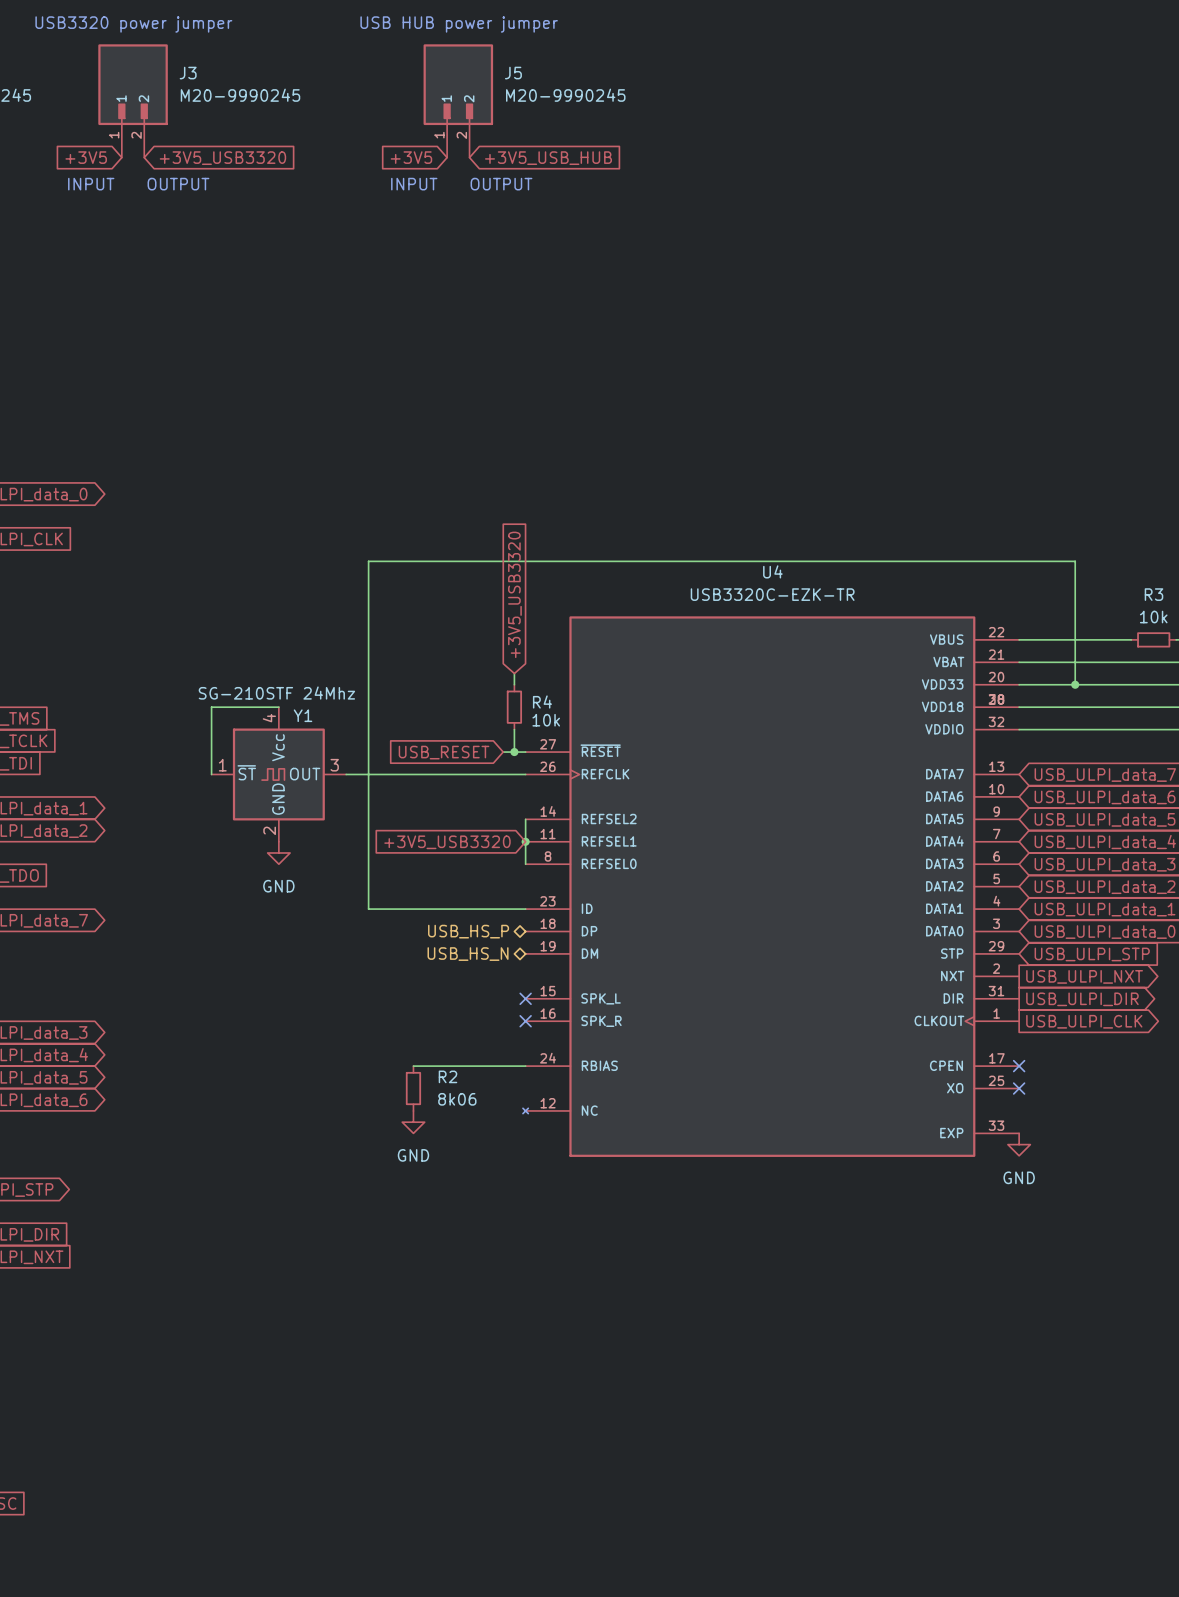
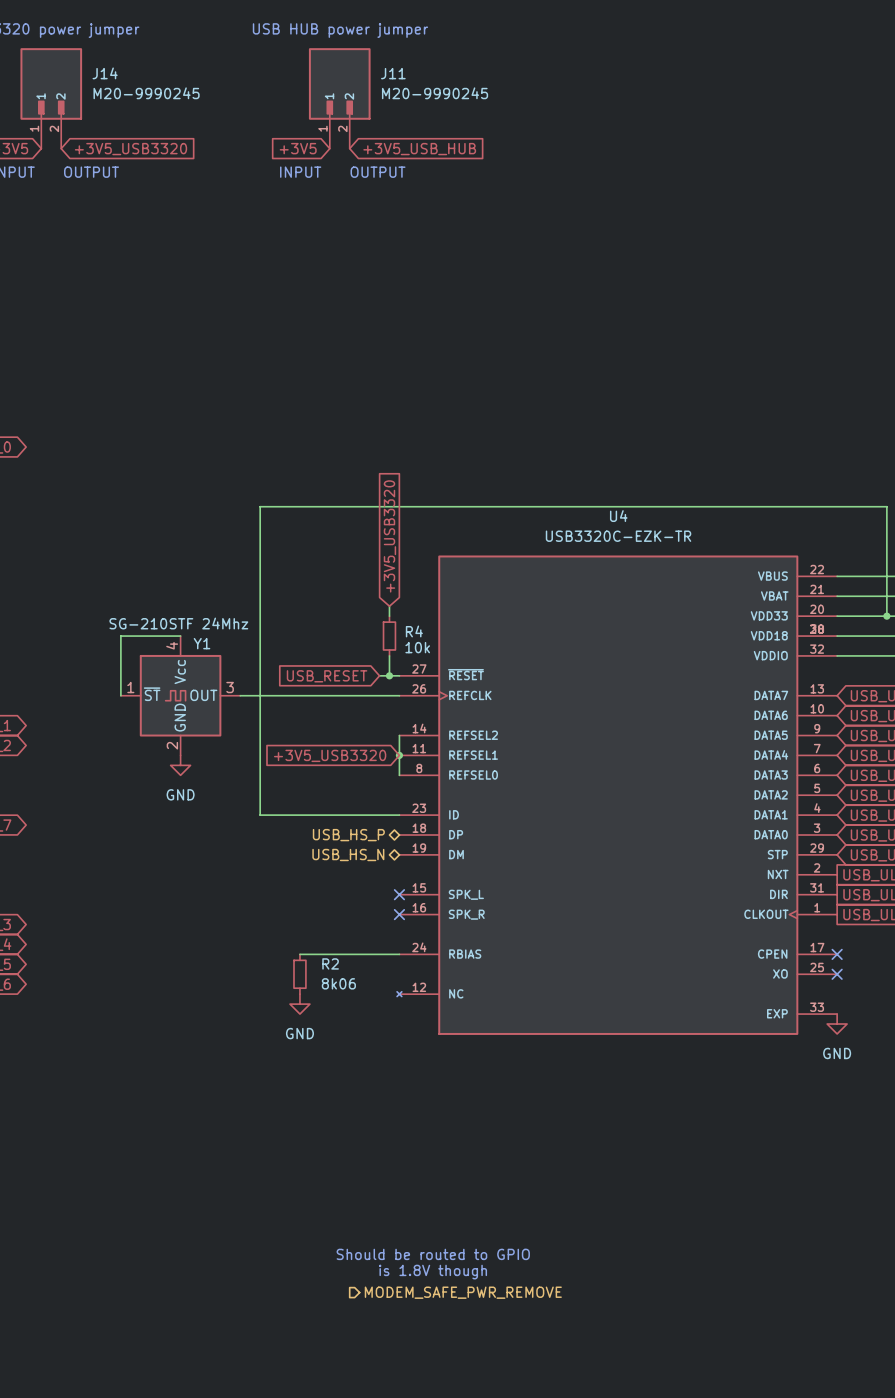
J3 name: J3 (188, 73) -> J14 (105, 73)
J5 name: J5 (513, 73) -> J11 (393, 73)
text: none -> Should be routed to GPIO (433, 1254)
text: none -> is 1.8V though (433, 1272)
hierarchical label: none -> MODEM_SAFE_PWR_REMOVE (463, 1292)

